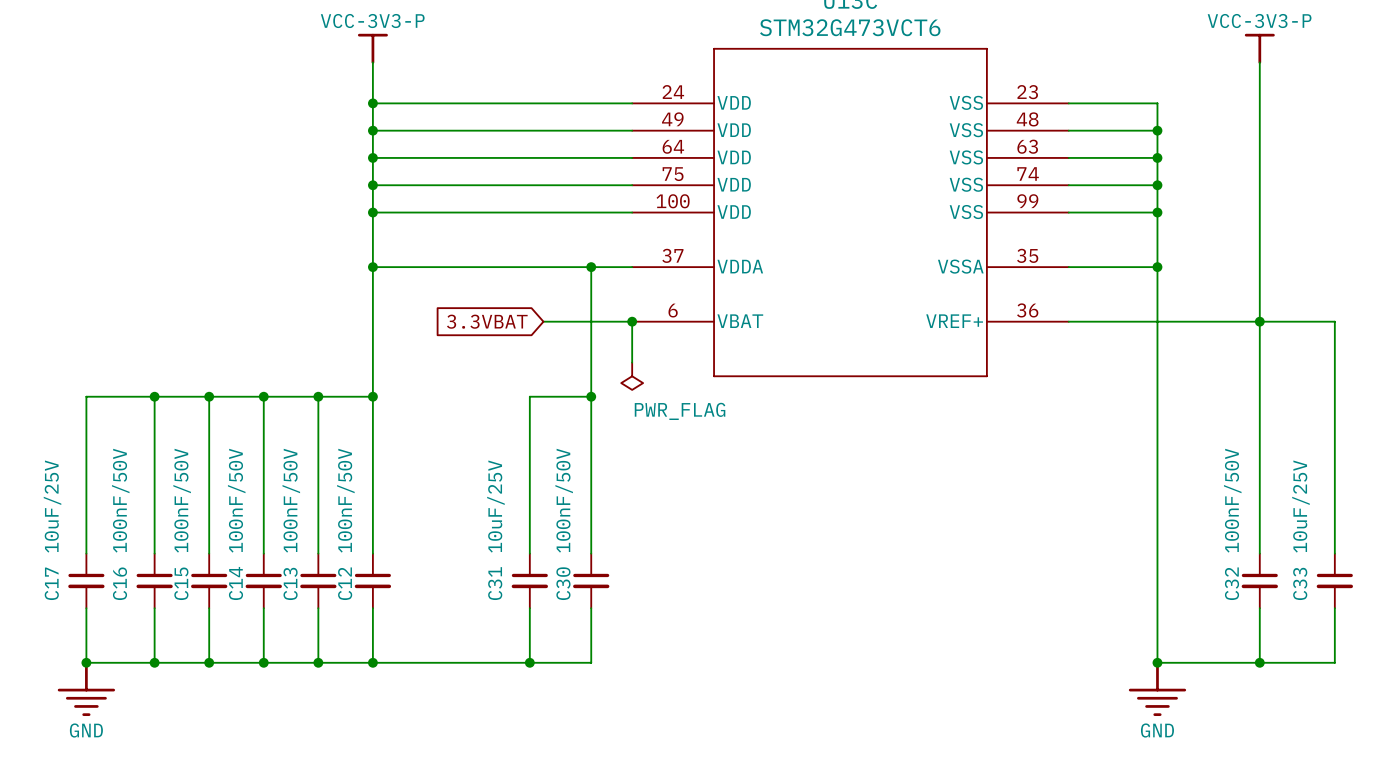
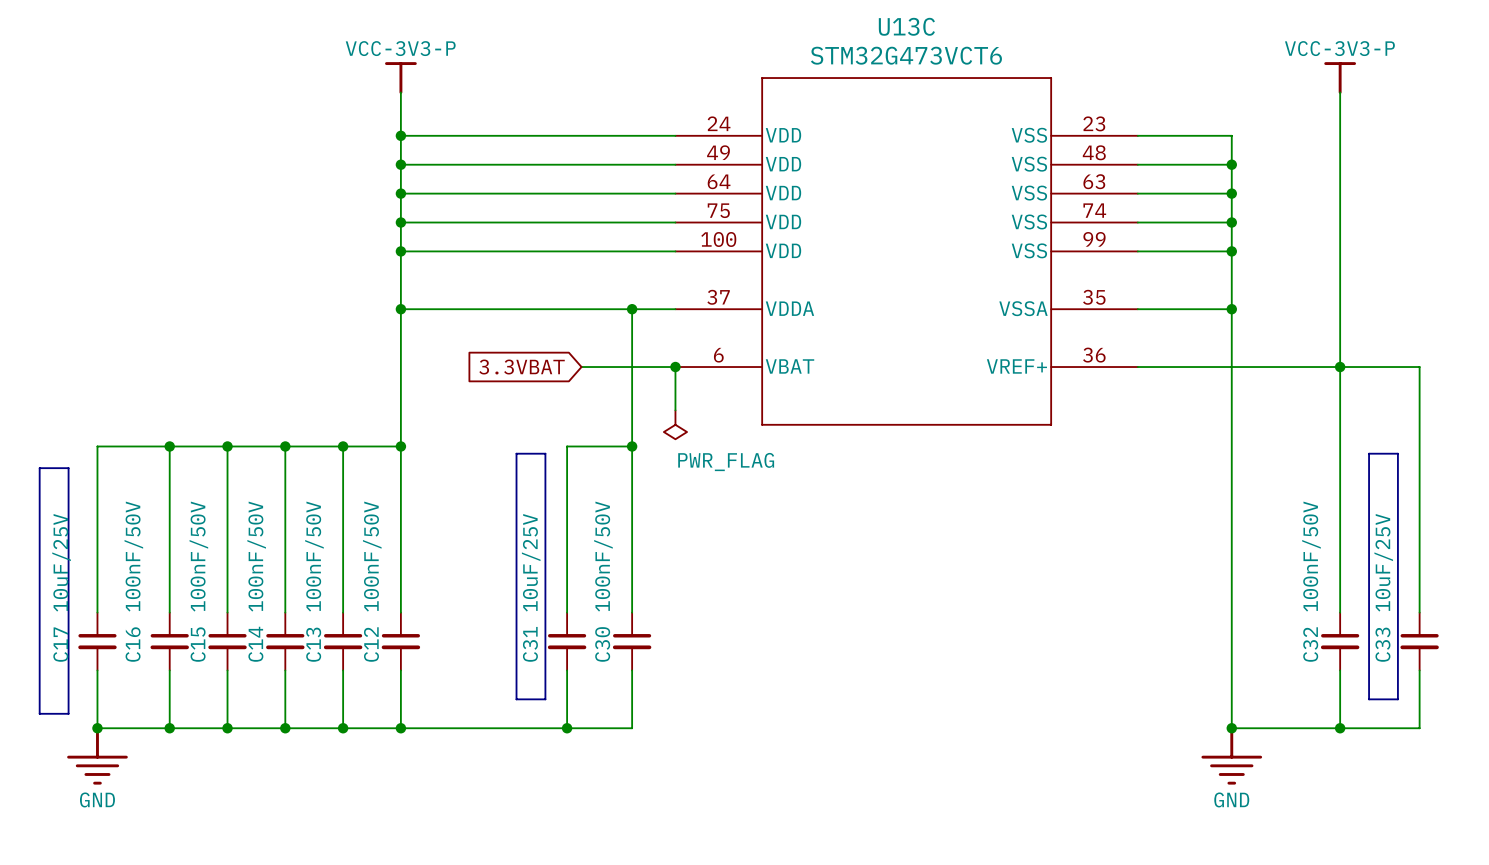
line: none -> (516, 453) (545, 453) (545, 699) (516, 699) (516, 453)
line: none -> (1369, 453) (1397, 453) (1397, 699) (1369, 699) (1369, 453)
line: none -> (39, 468) (68, 468) (68, 713) (39, 713) (39, 468)

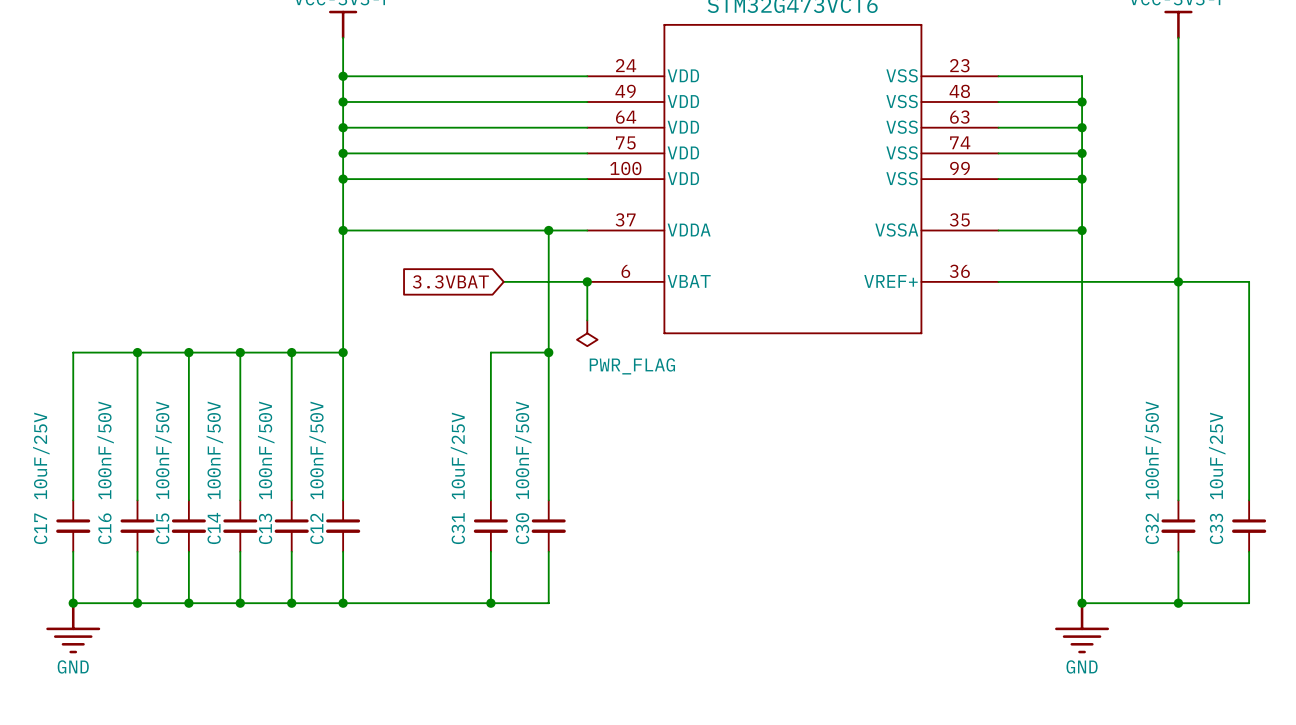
line: (516, 453) (545, 453) (545, 699) (516, 699) (516, 453) -> none
line: (1369, 453) (1397, 453) (1397, 699) (1369, 699) (1369, 453) -> none
line: (39, 468) (68, 468) (68, 713) (39, 713) (39, 468) -> none

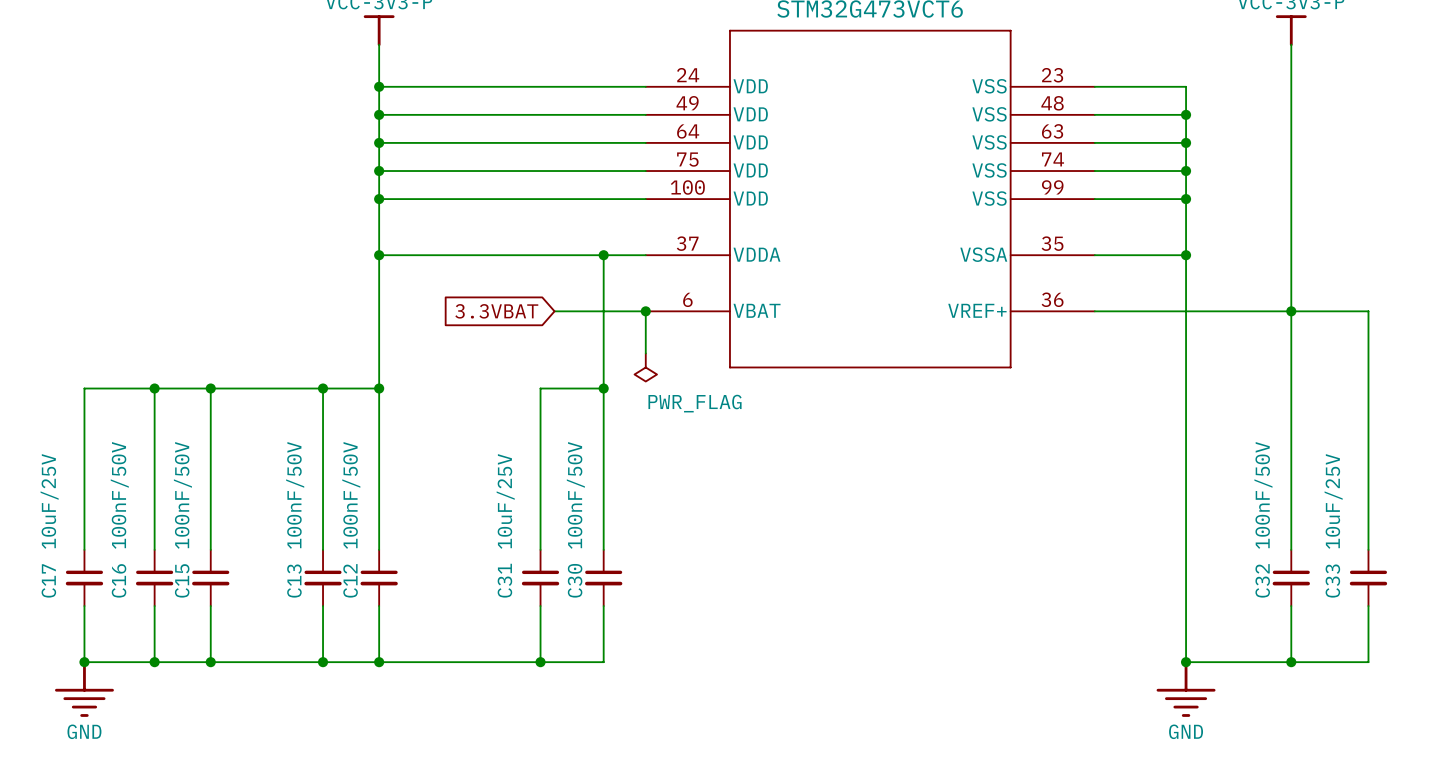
wire: (240, 352) (240, 500) -> none
junction: (240, 352) -> none
C14: 100nF/50V (240, 526) -> none
wire: (240, 551) (240, 603) -> none
junction: (240, 603) -> none

